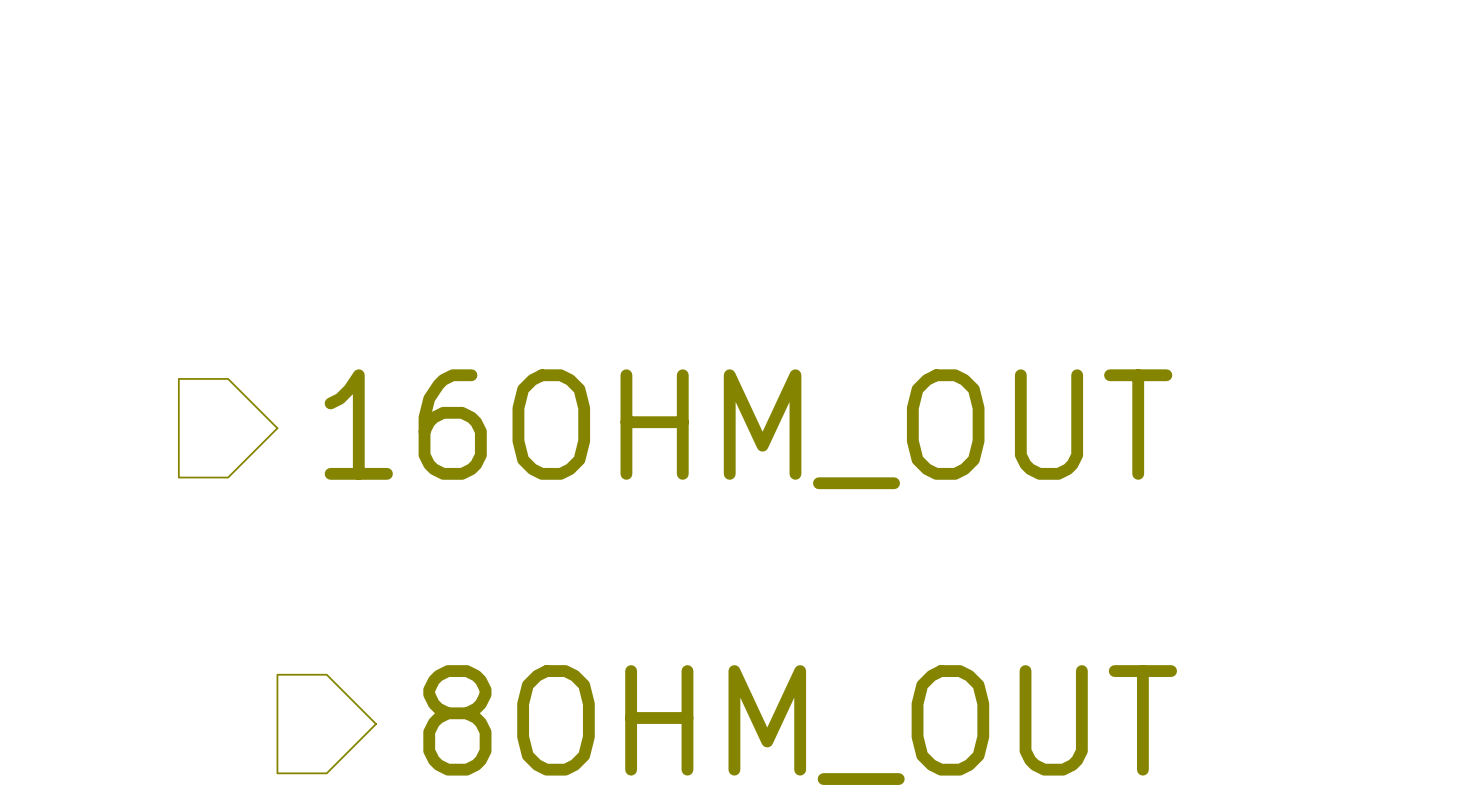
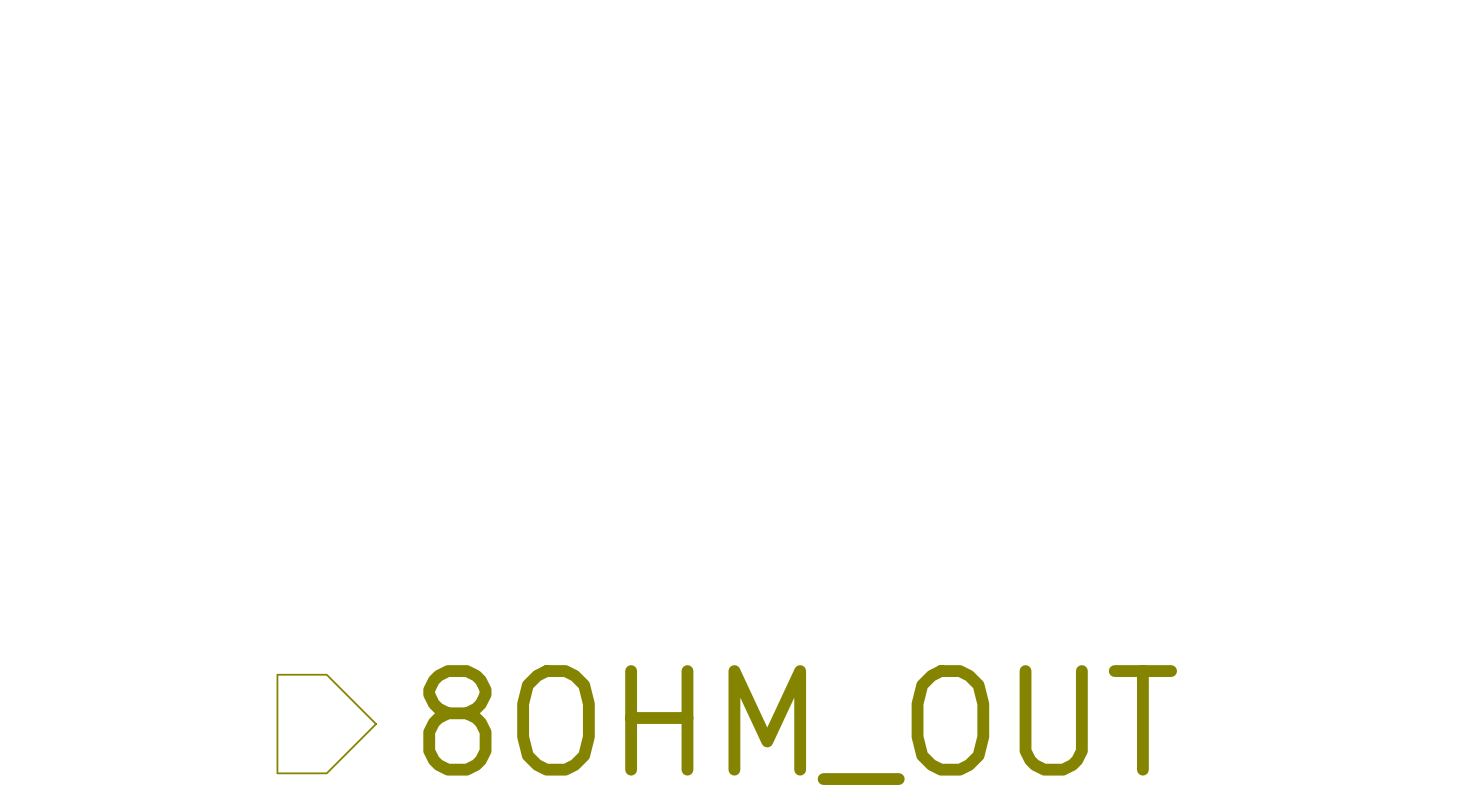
hierarchical label: 16OHM_OUT (748, 429) -> none

